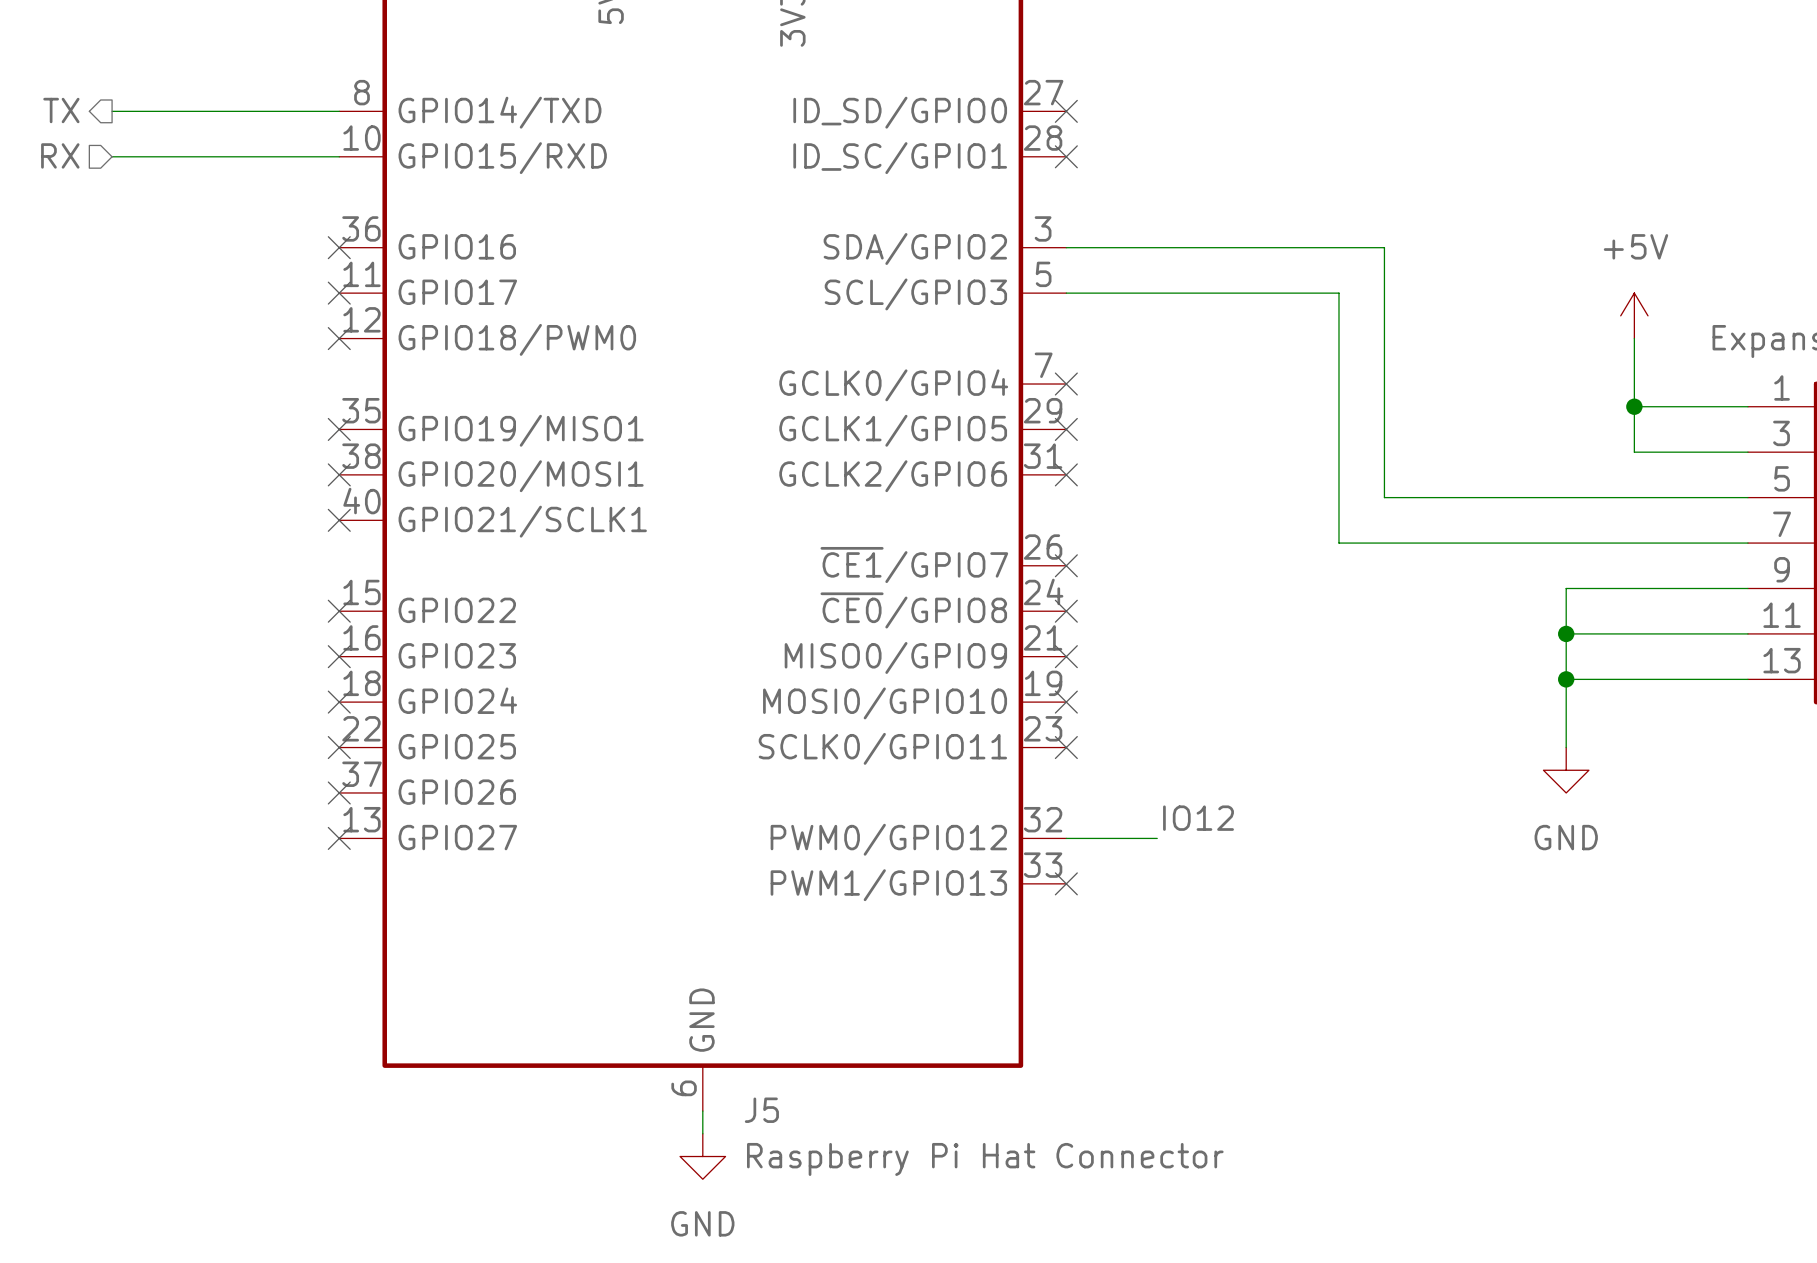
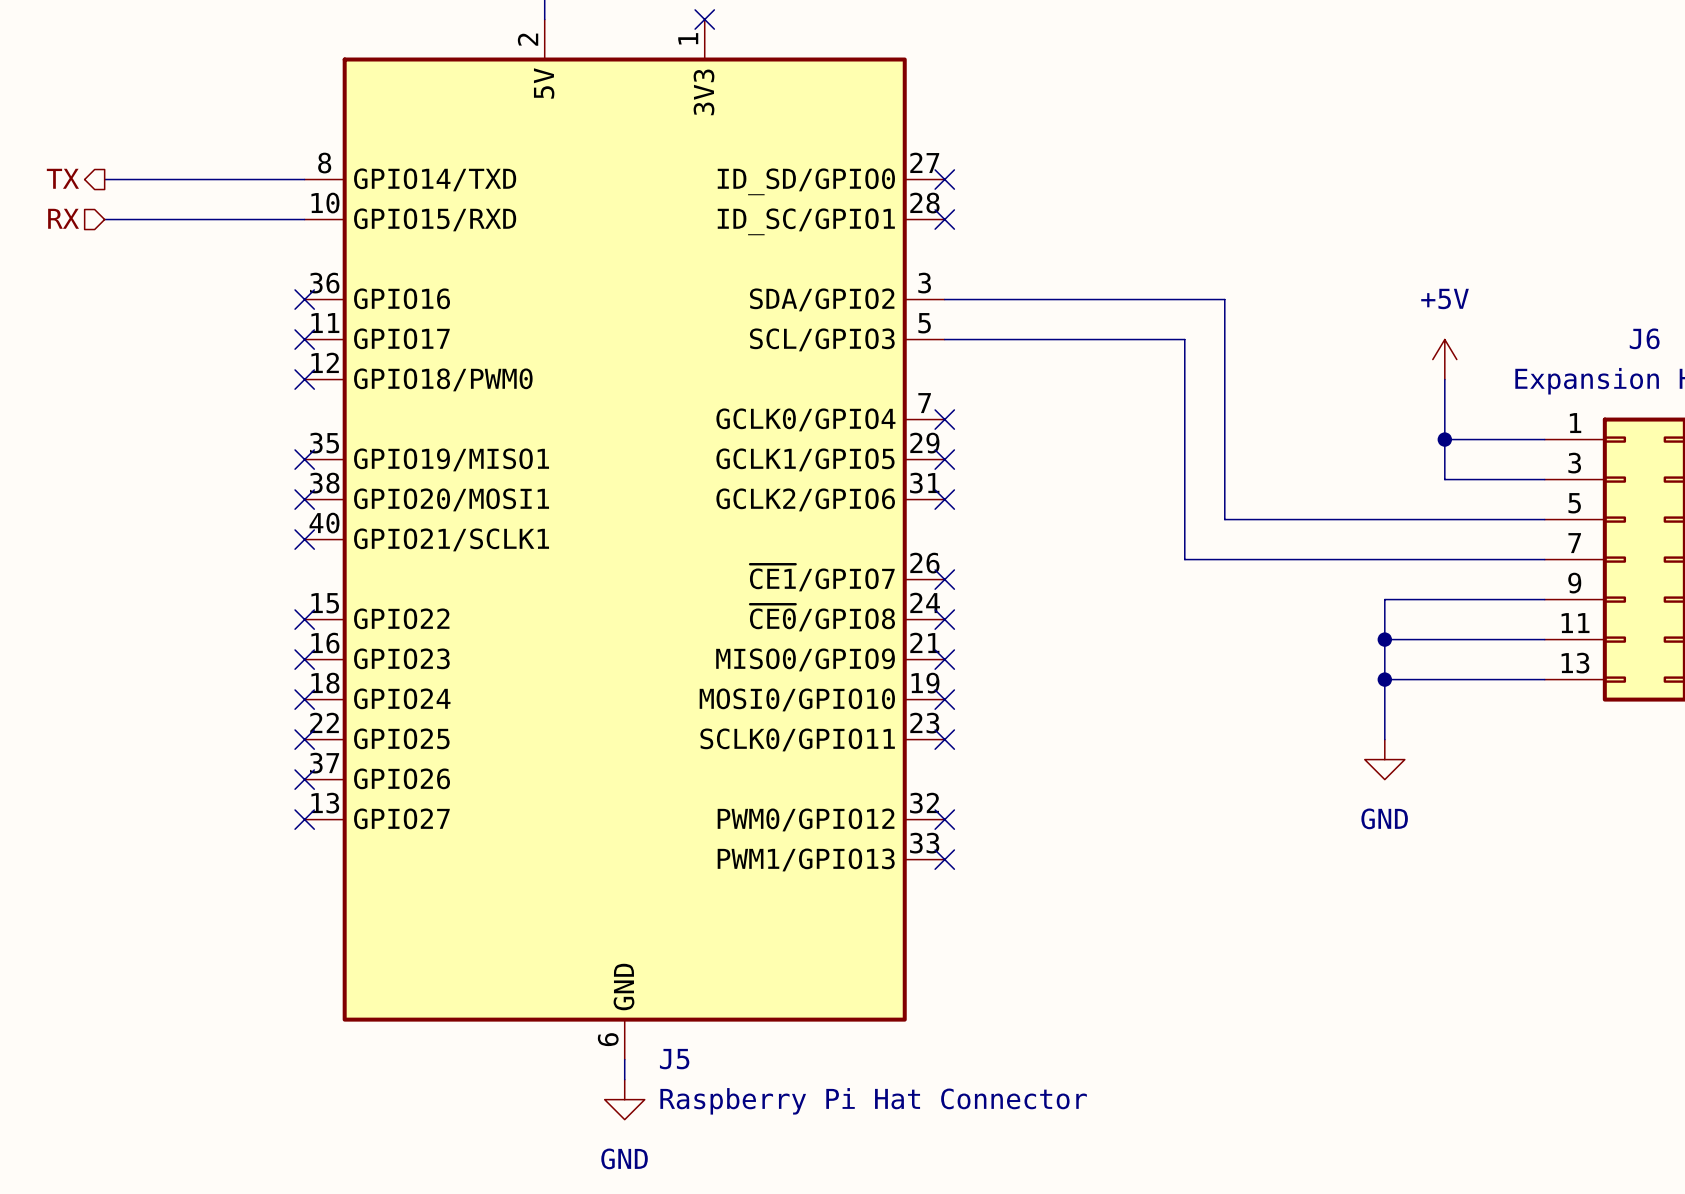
label: IO12 (1198, 818) -> none
wire: (1066, 838) (1157, 838) -> none
no-connect mark: none -> (944, 819)

